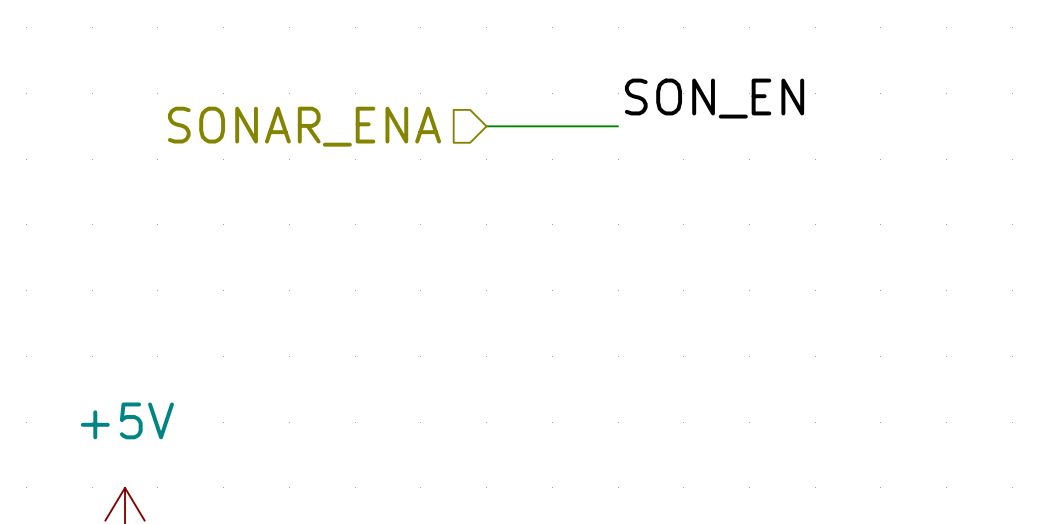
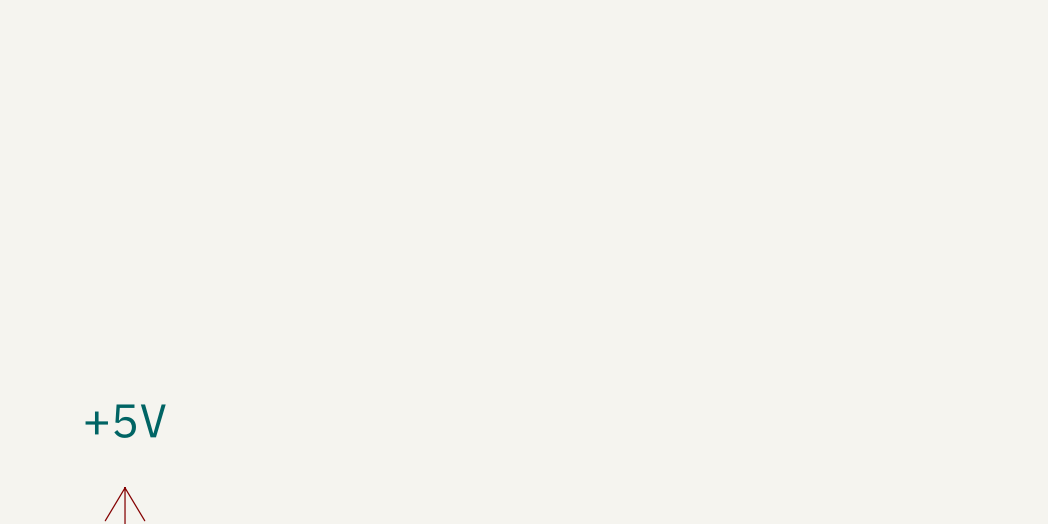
label: SON_EN (714, 98) -> none
hierarchical label: SONAR_ENA (304, 126) -> none
wire: (486, 126) (618, 126) -> none

